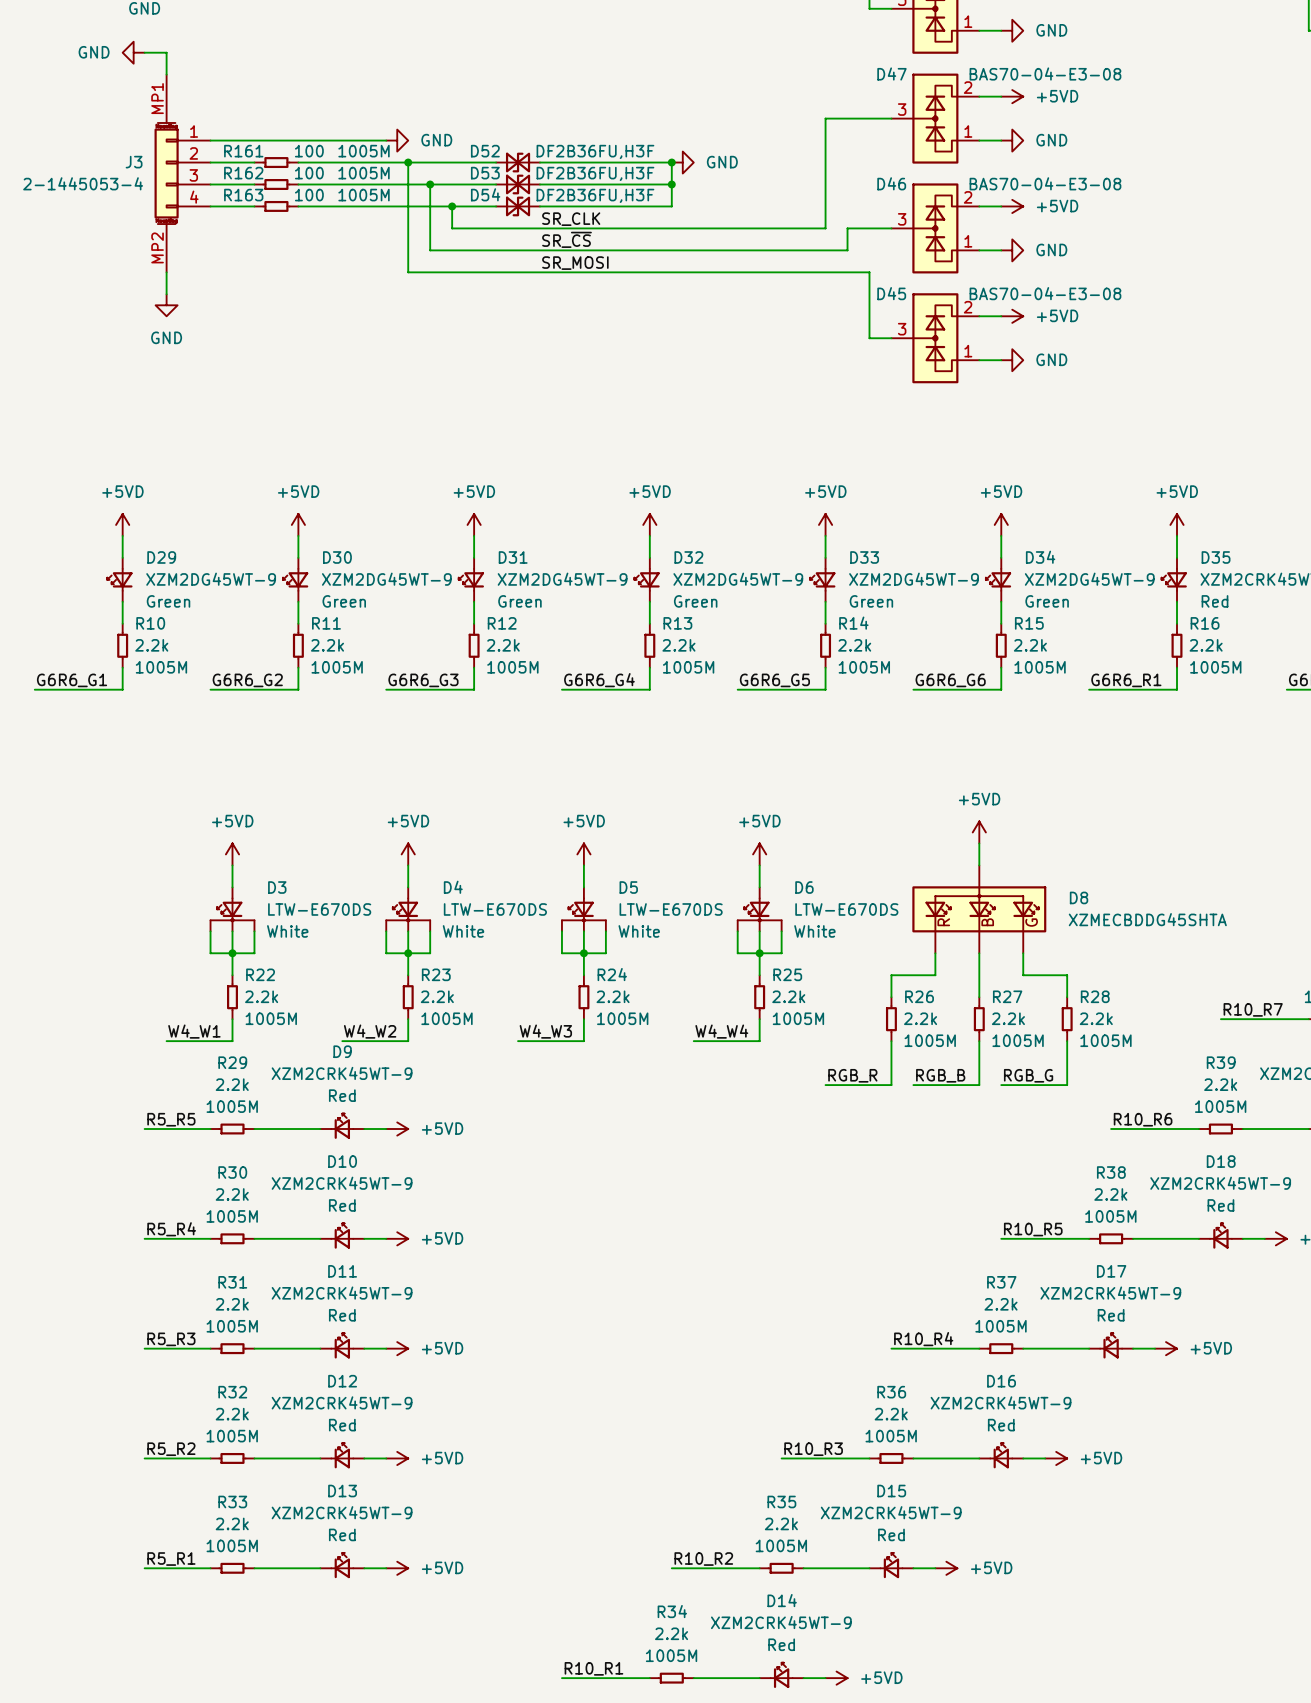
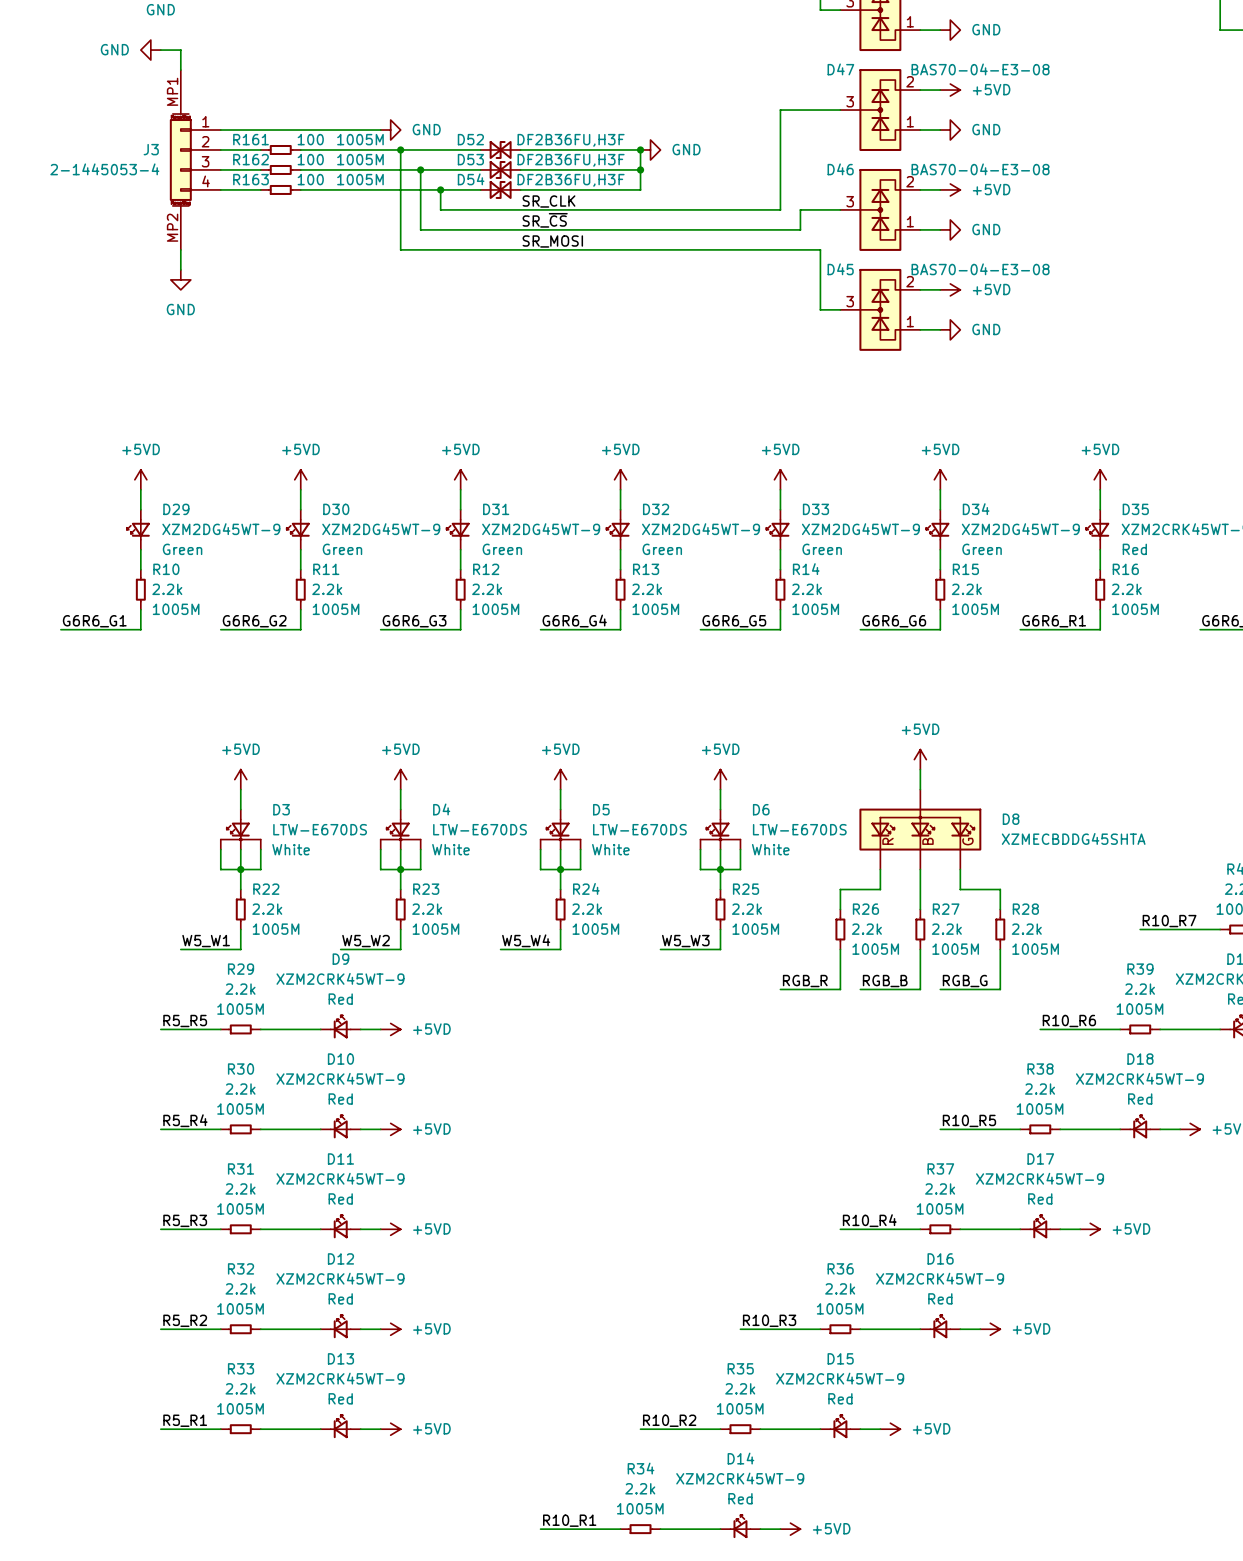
label: W4_W1 (194, 1031) -> W5_W1 (206, 941)
label: W4_W2 (370, 1031) -> W5_W2 (366, 941)
label: W4_W3 (545, 1031) -> W5_W4 (526, 940)
label: W4_W4 (721, 1031) -> W5_W3 (685, 941)

